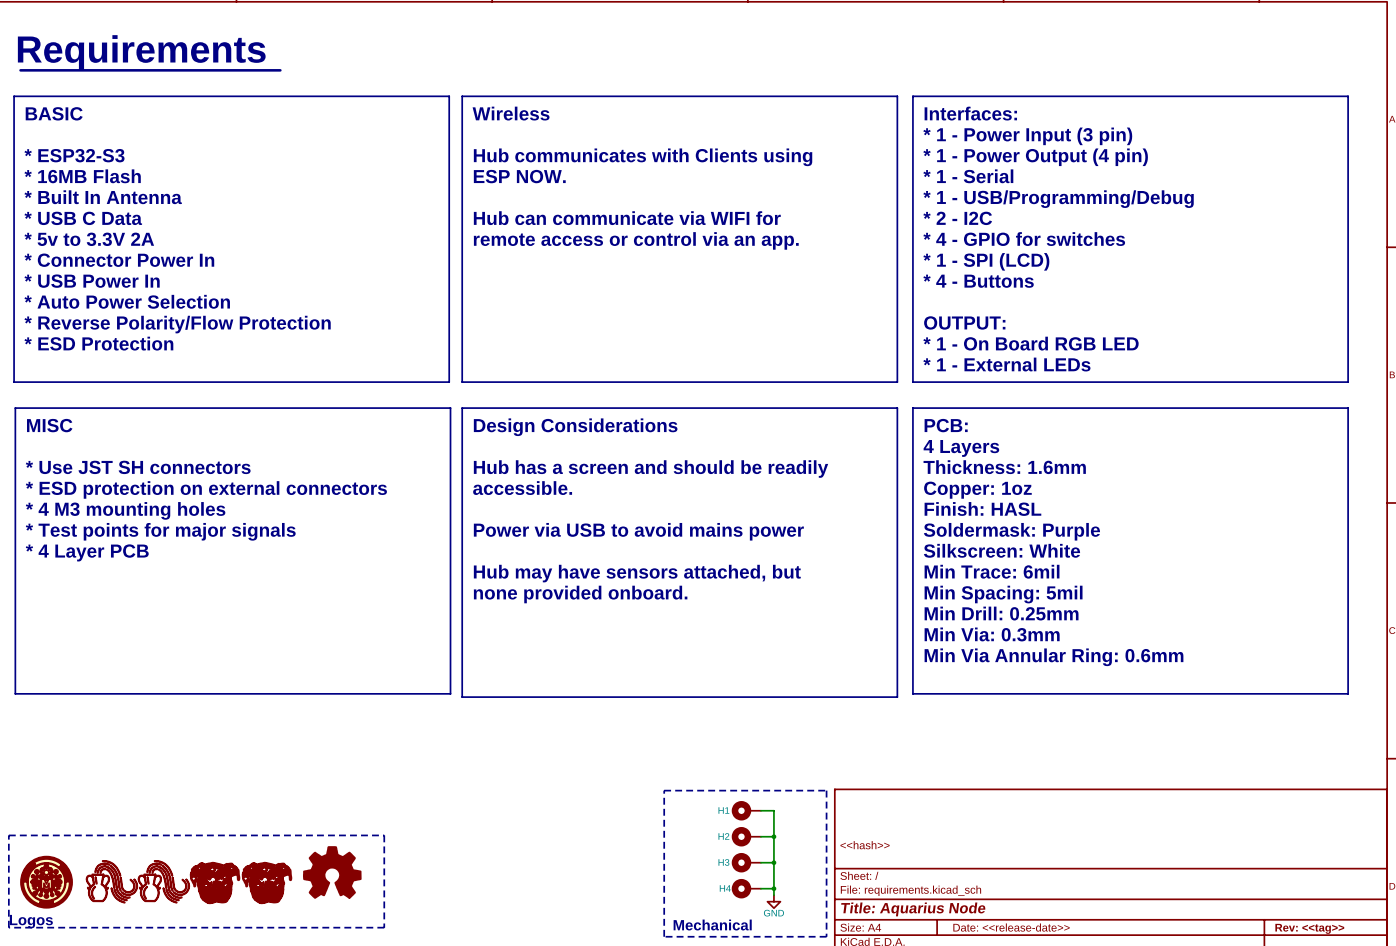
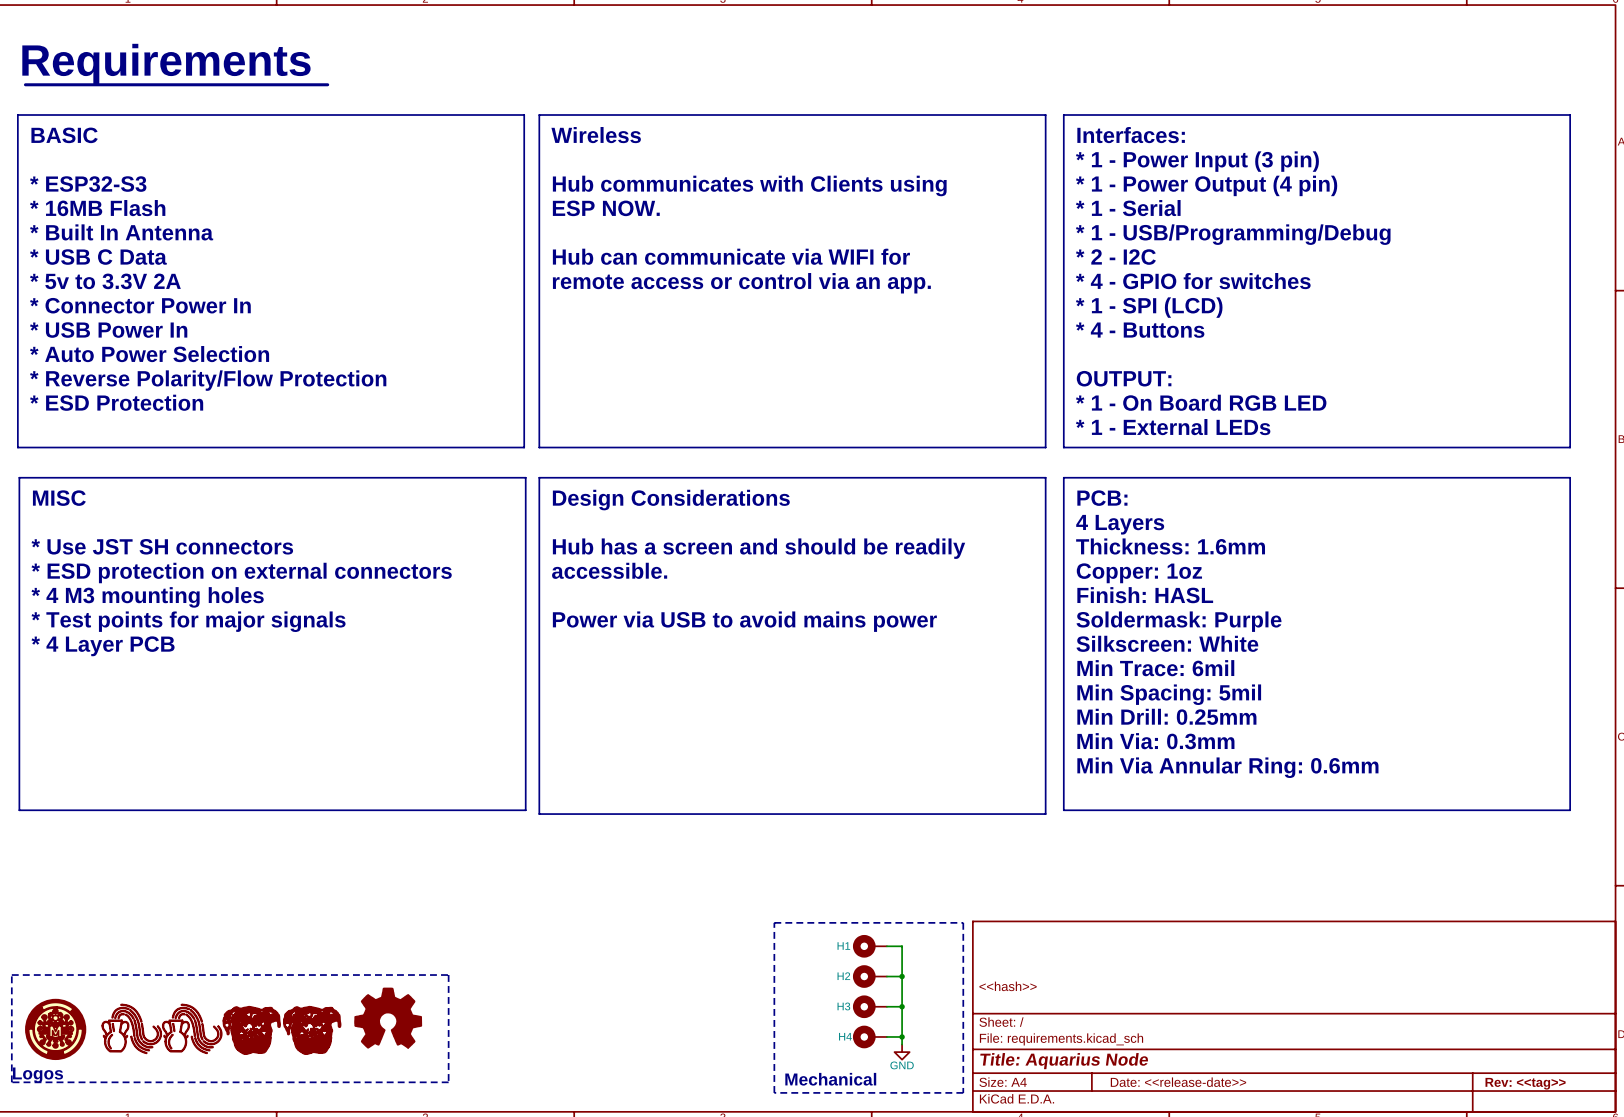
text: Hub may have sensors attached, but (637, 573) -> none
text: none provided onboard. (580, 594) -> none

